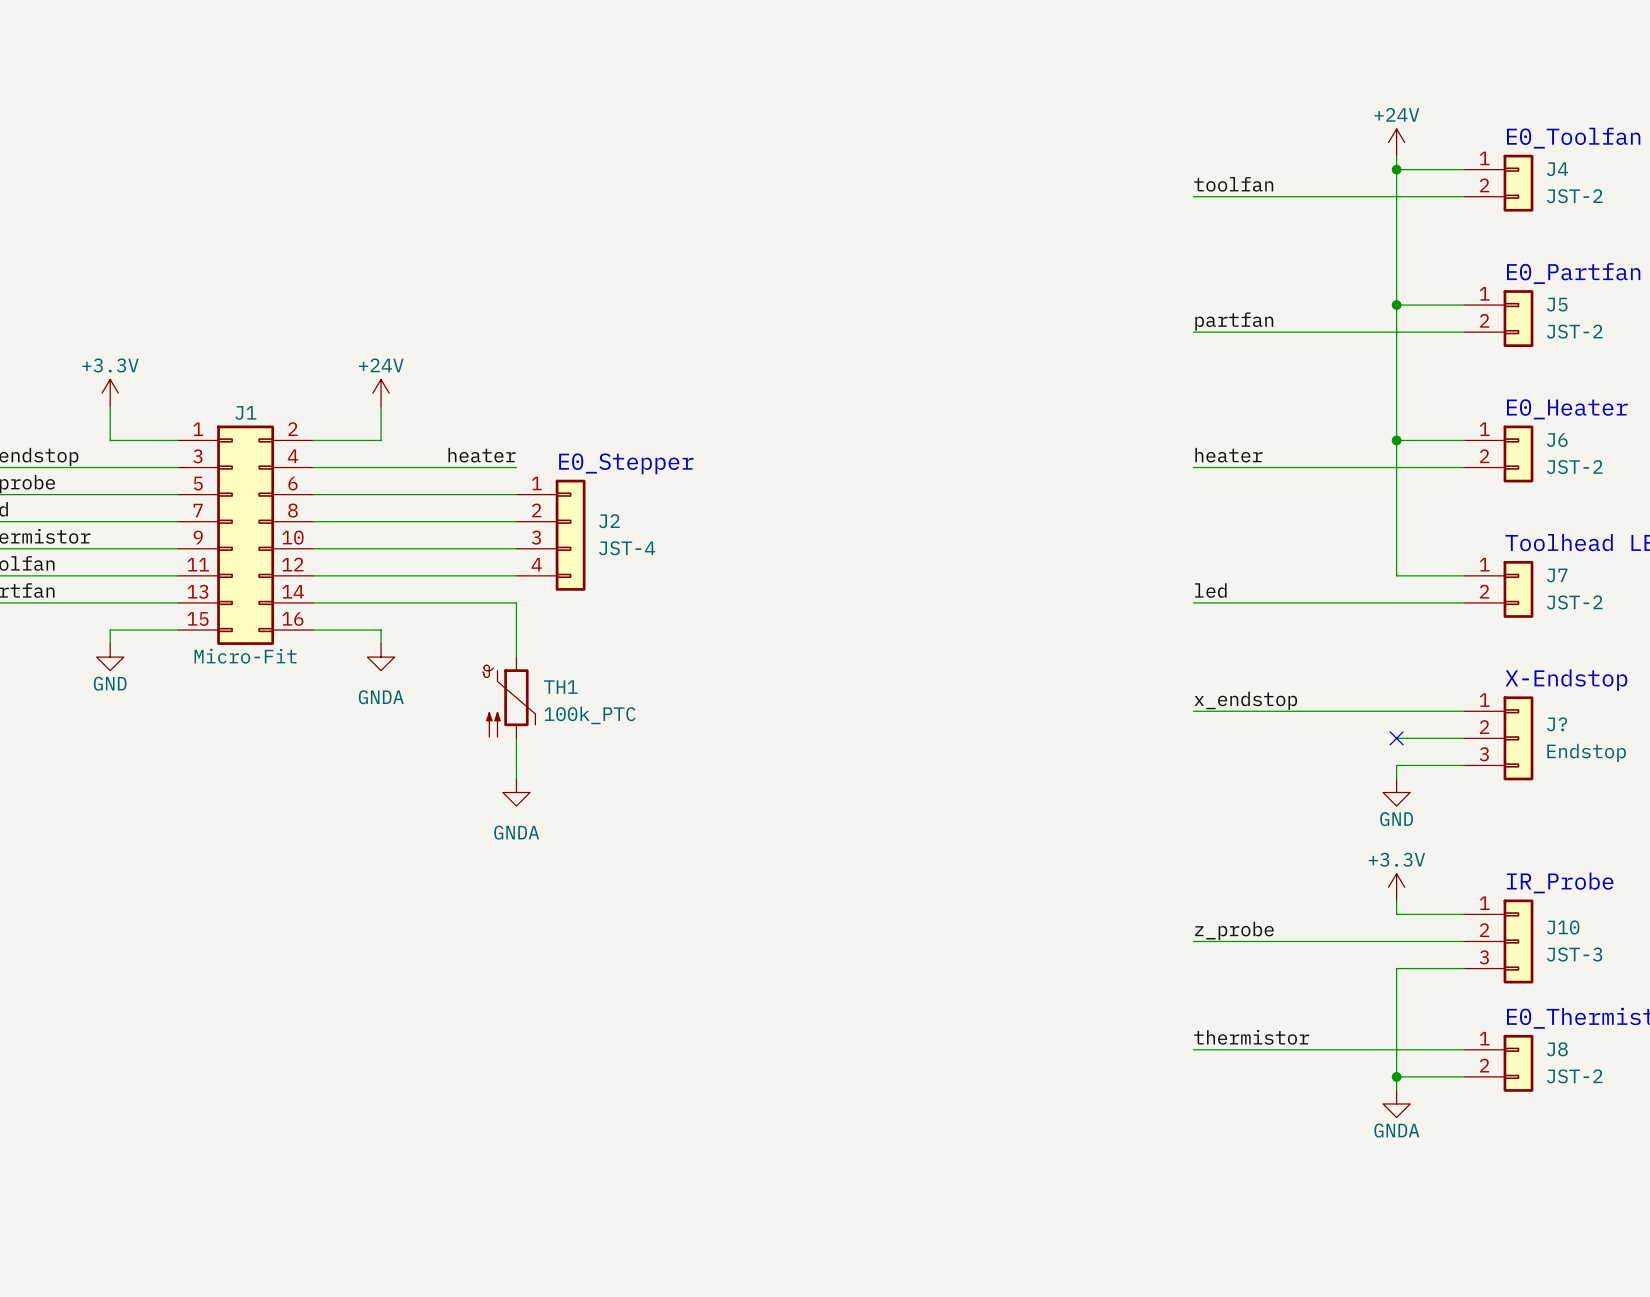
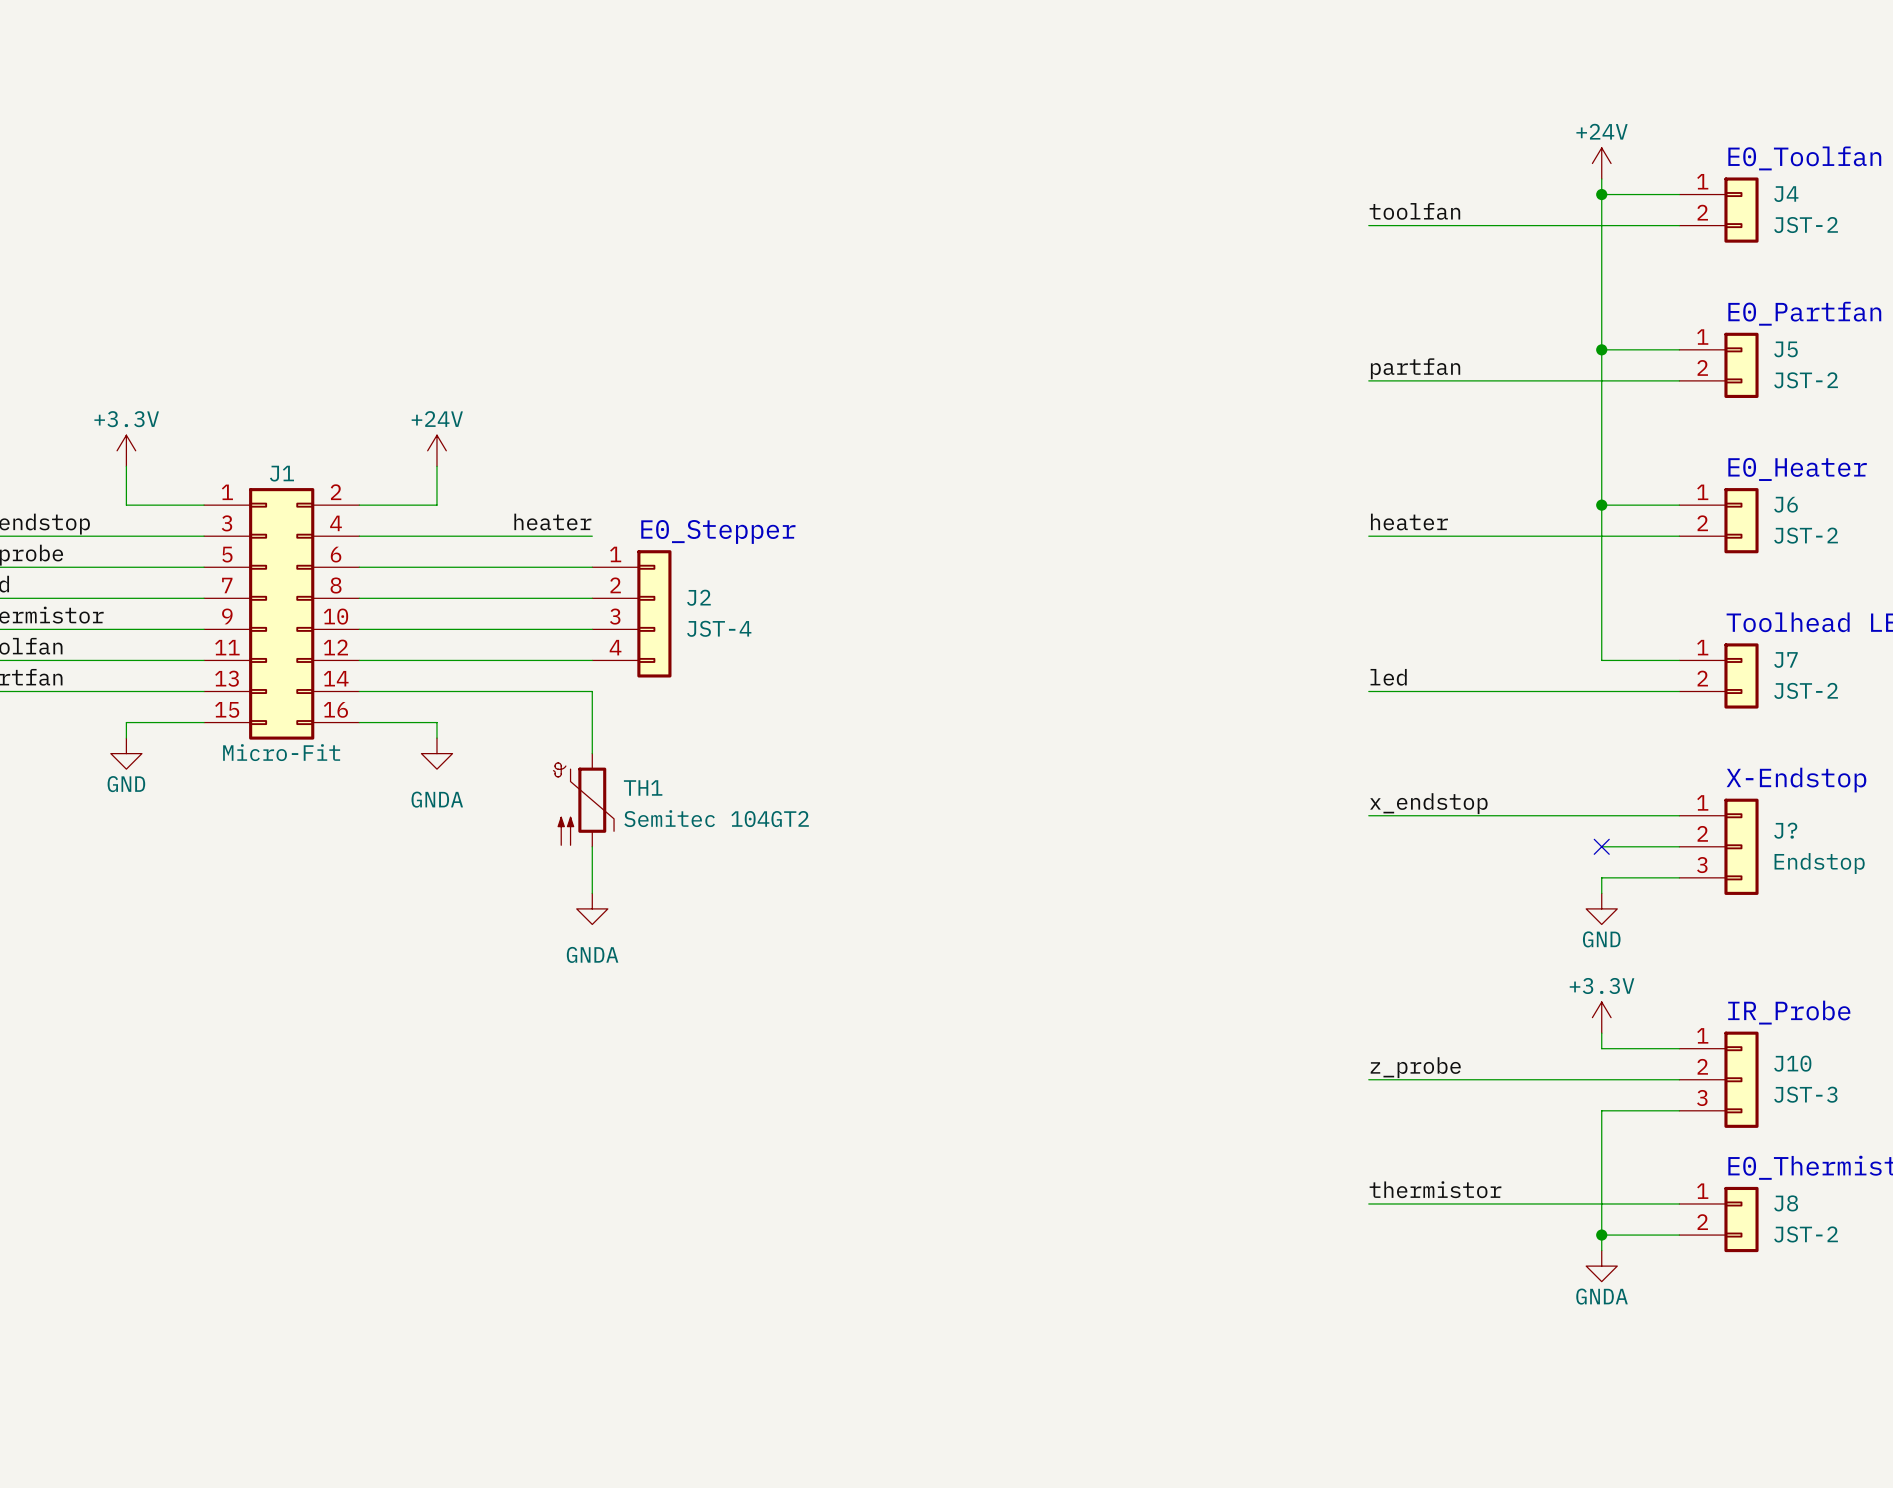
TH1 value: 100k_PTC (590, 715) -> Semitec 104GT2 (716, 818)

